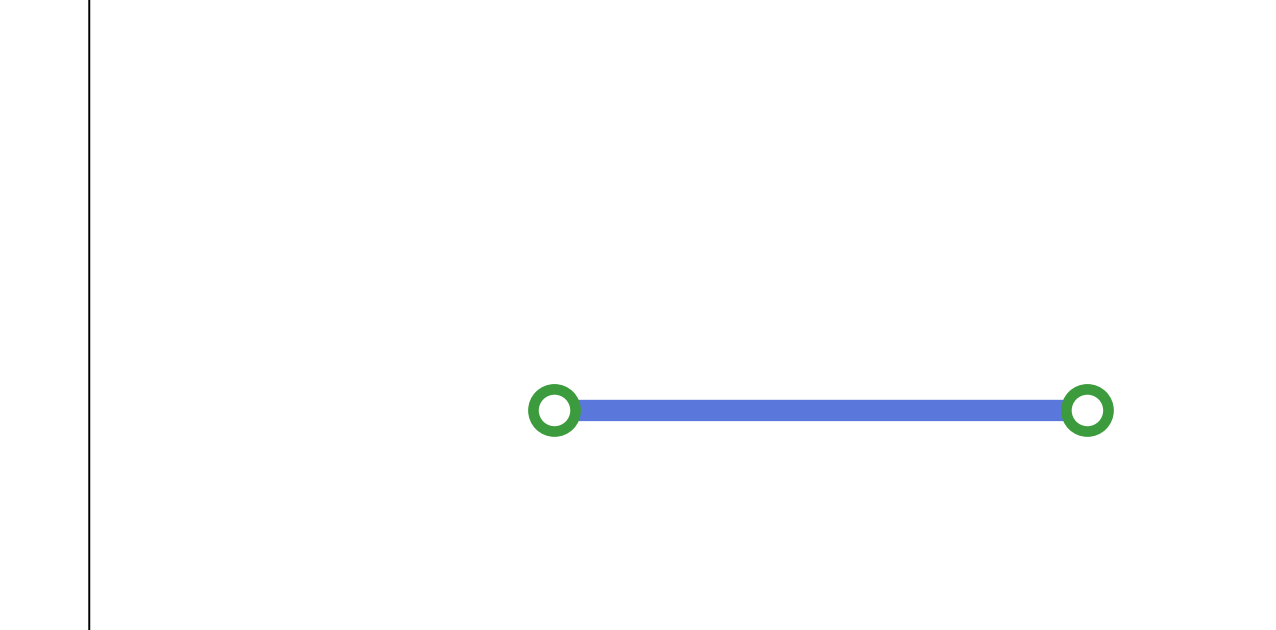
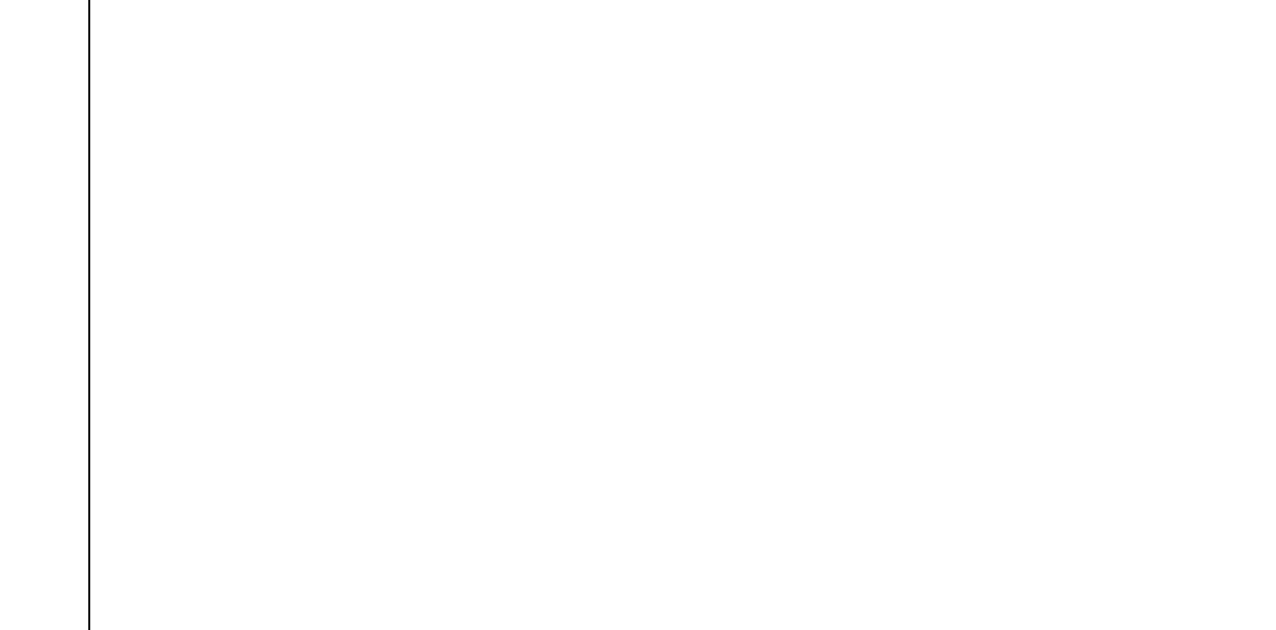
via: (554, 410) -> none
track: (1087, 410) (554, 410) -> none
via: (1087, 410) -> none

